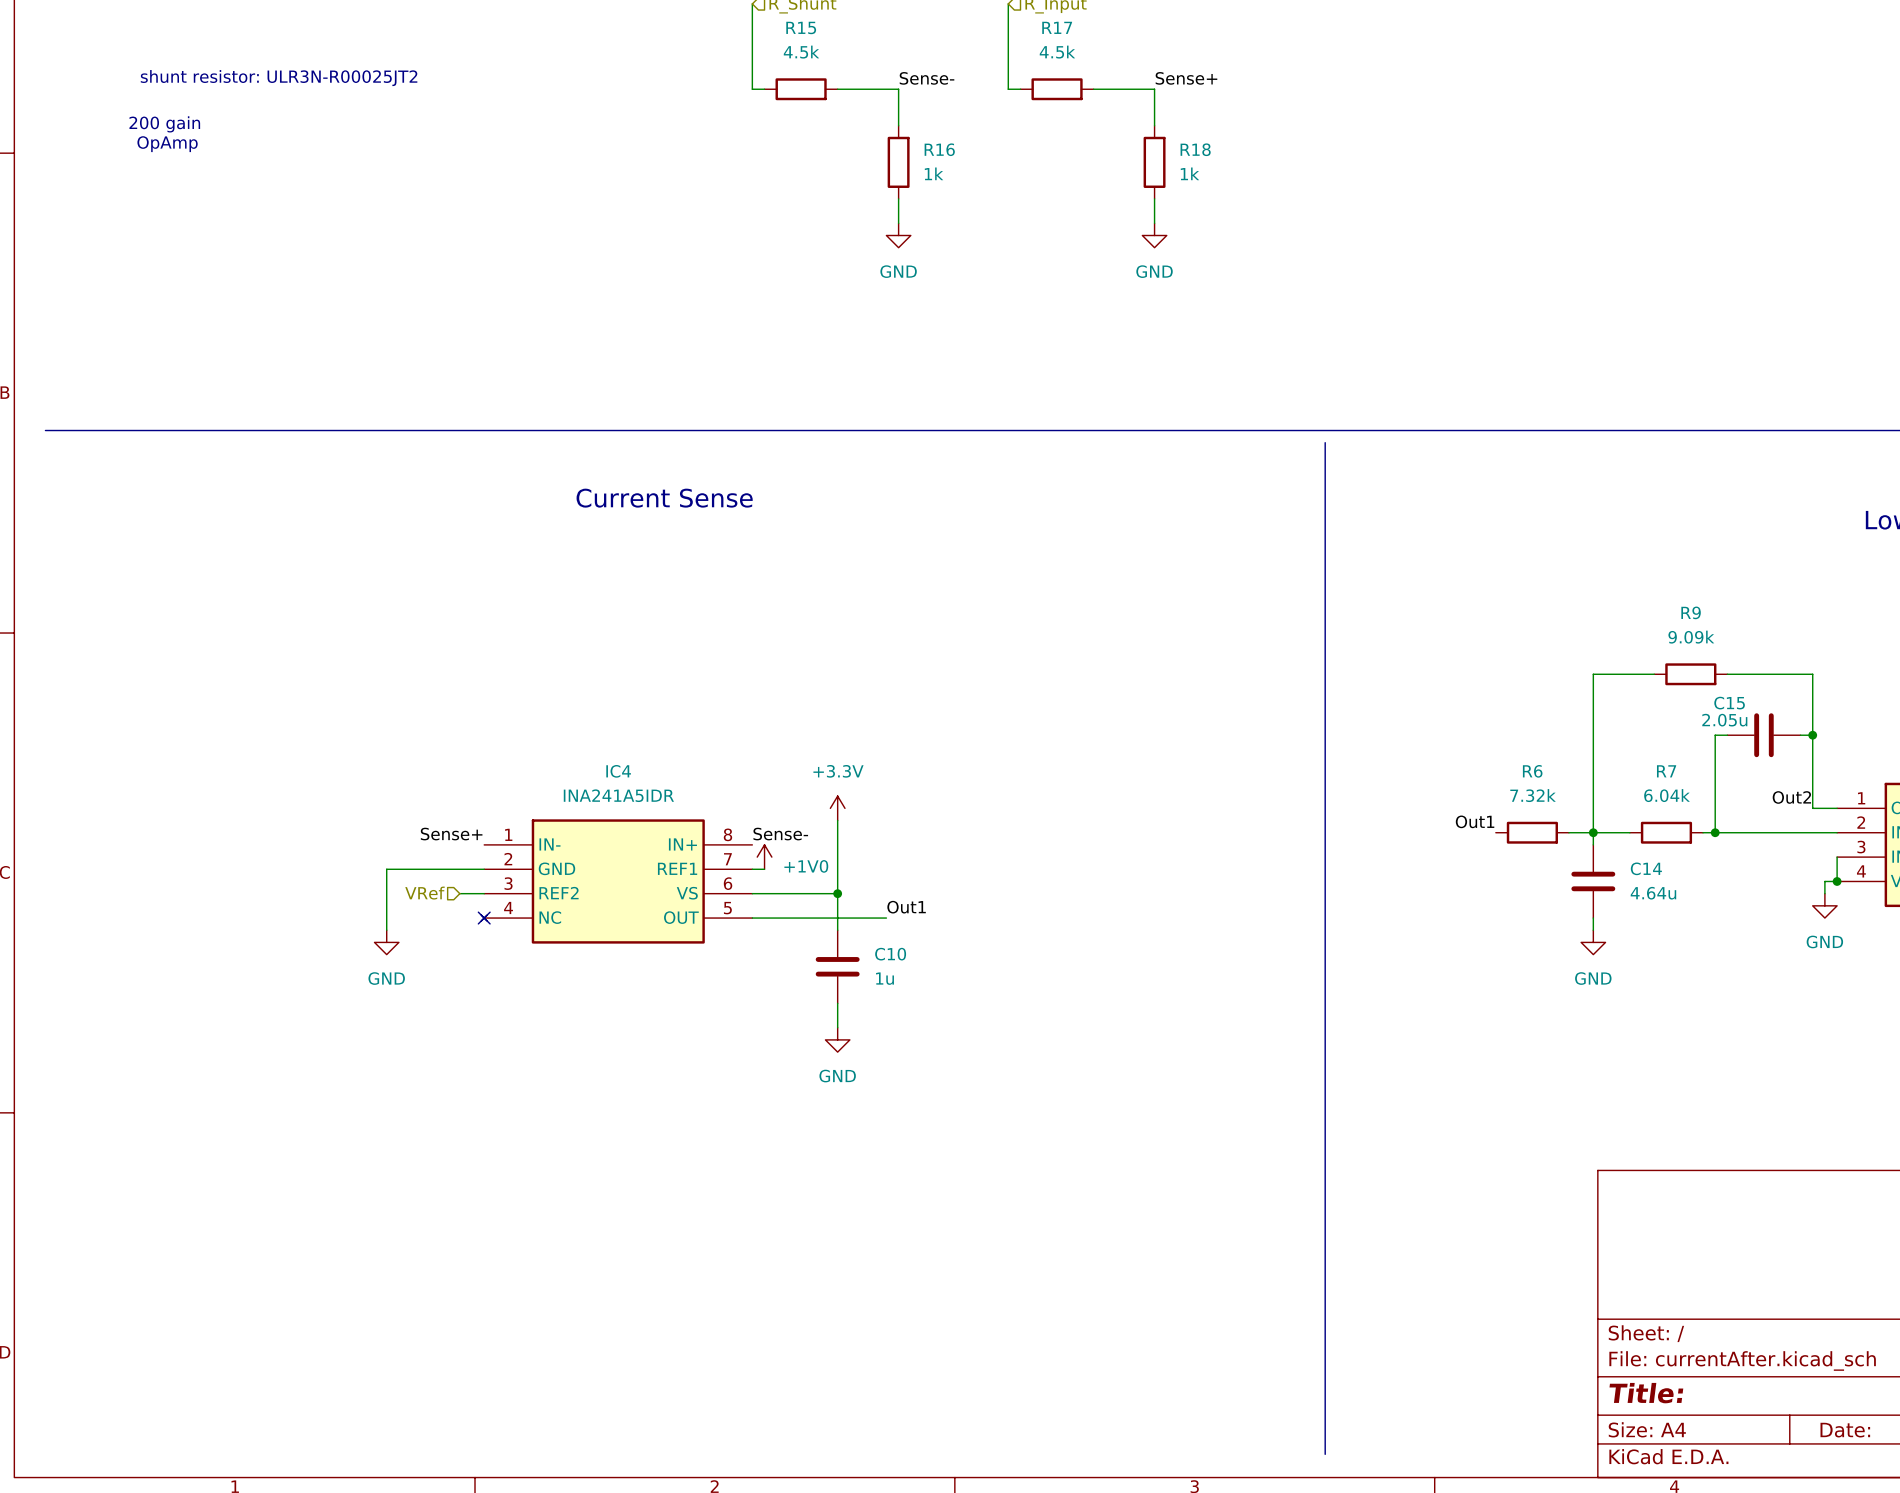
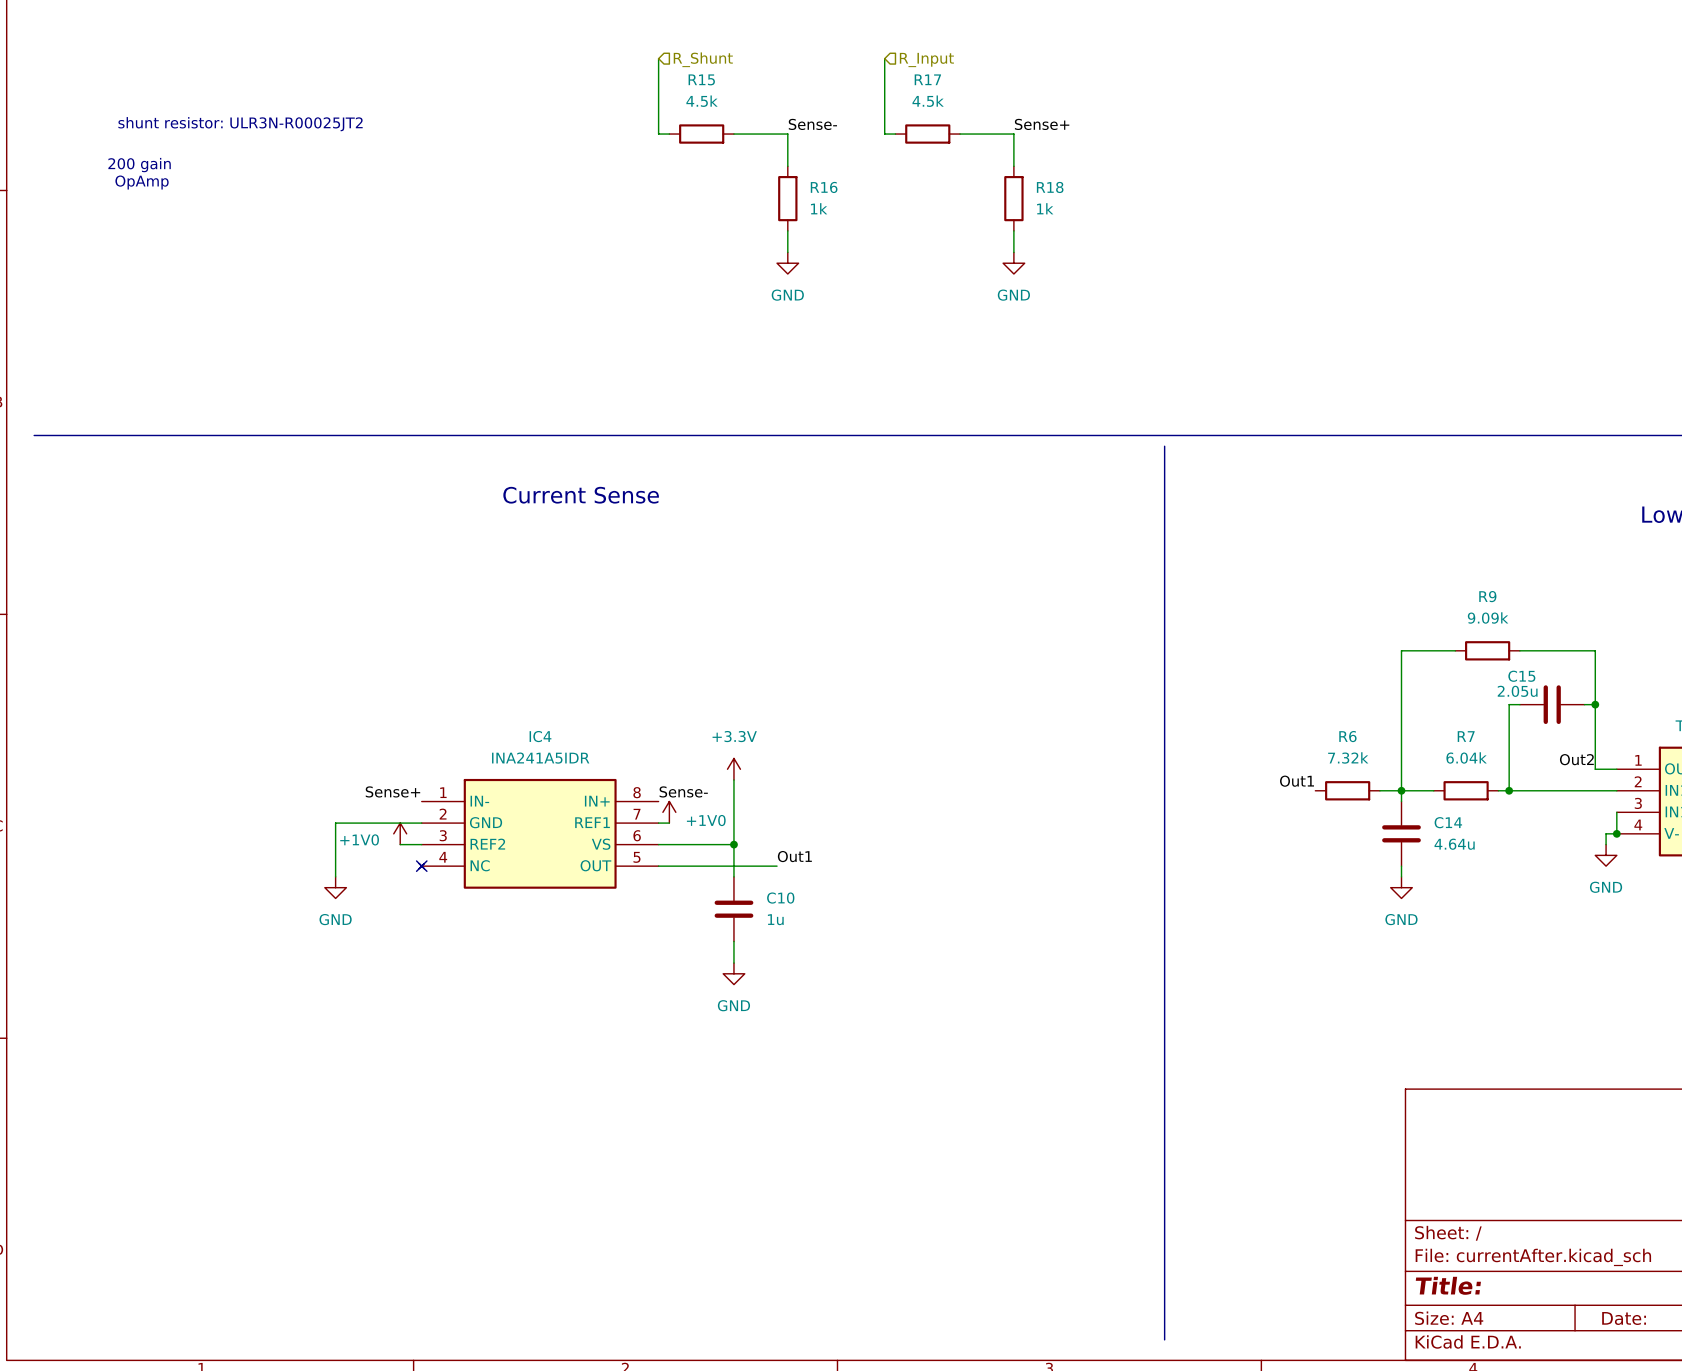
power symbol: none -> +1V0 (400, 833)
hierarchical label: VRef (424, 893) -> none

